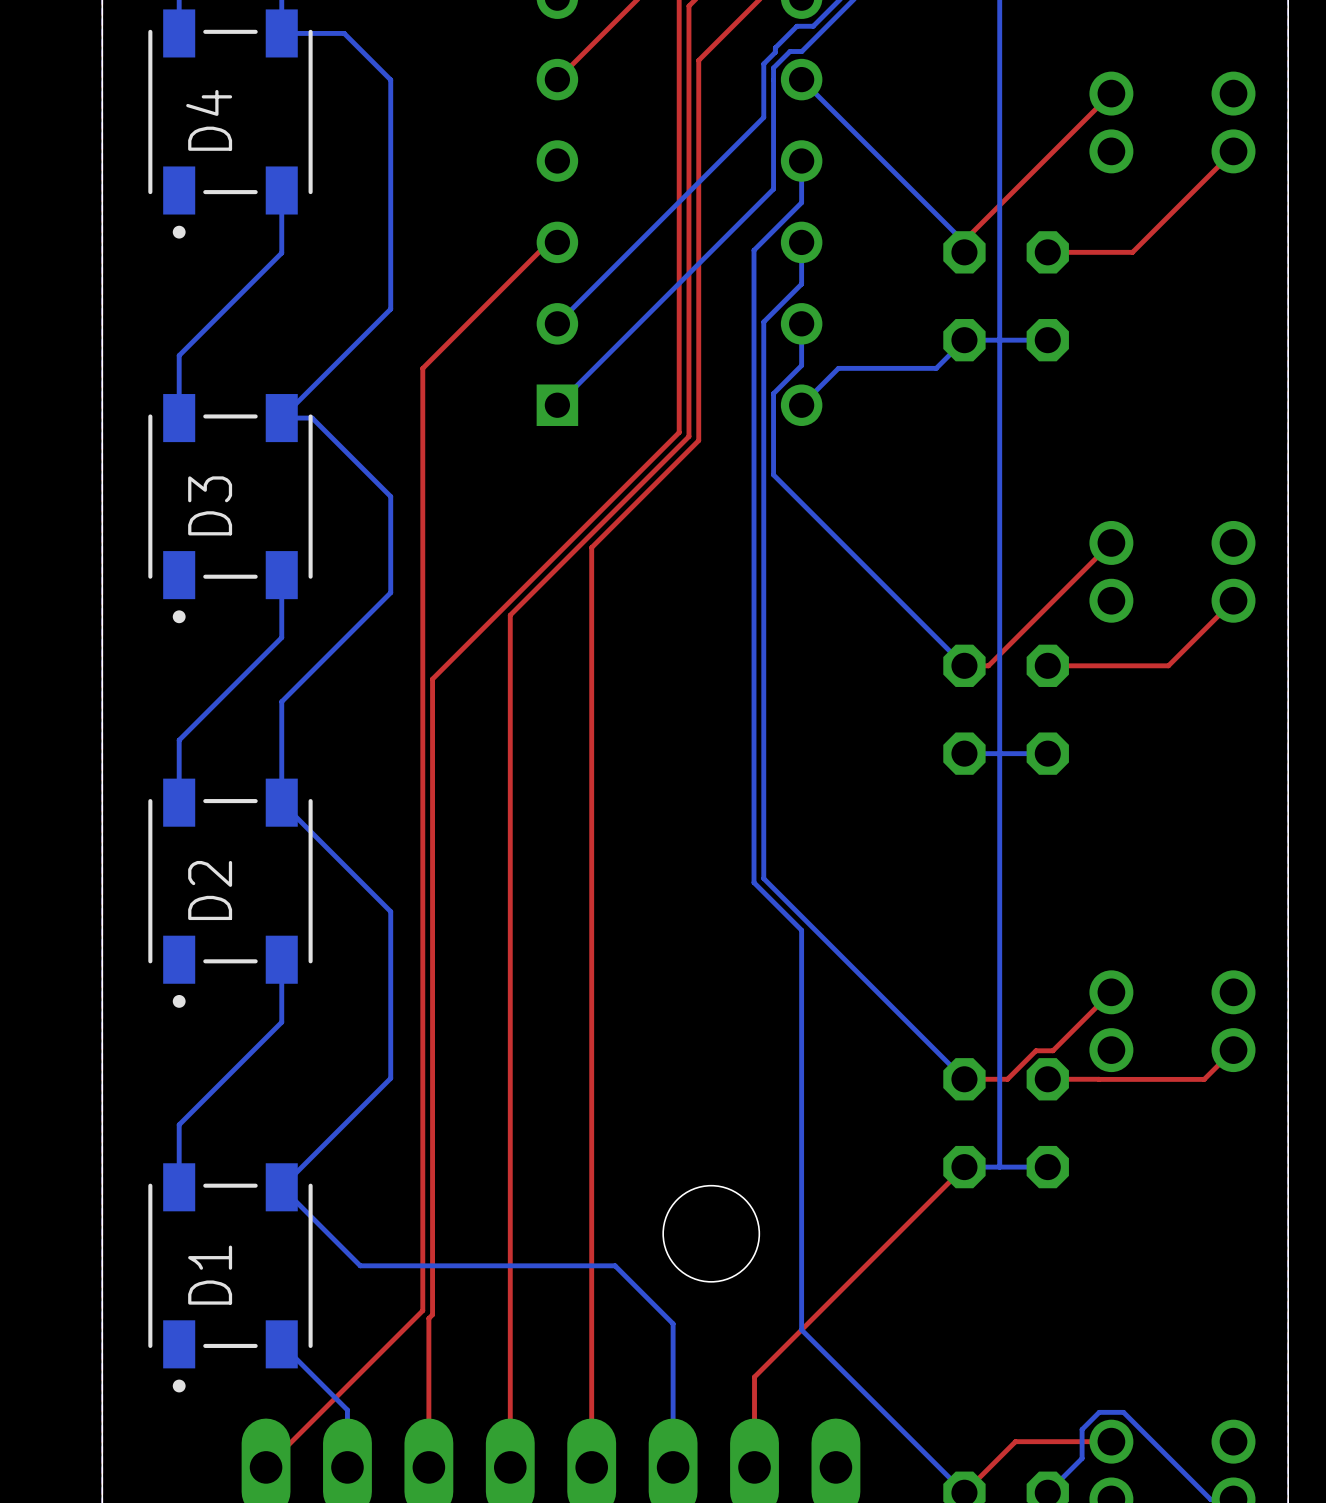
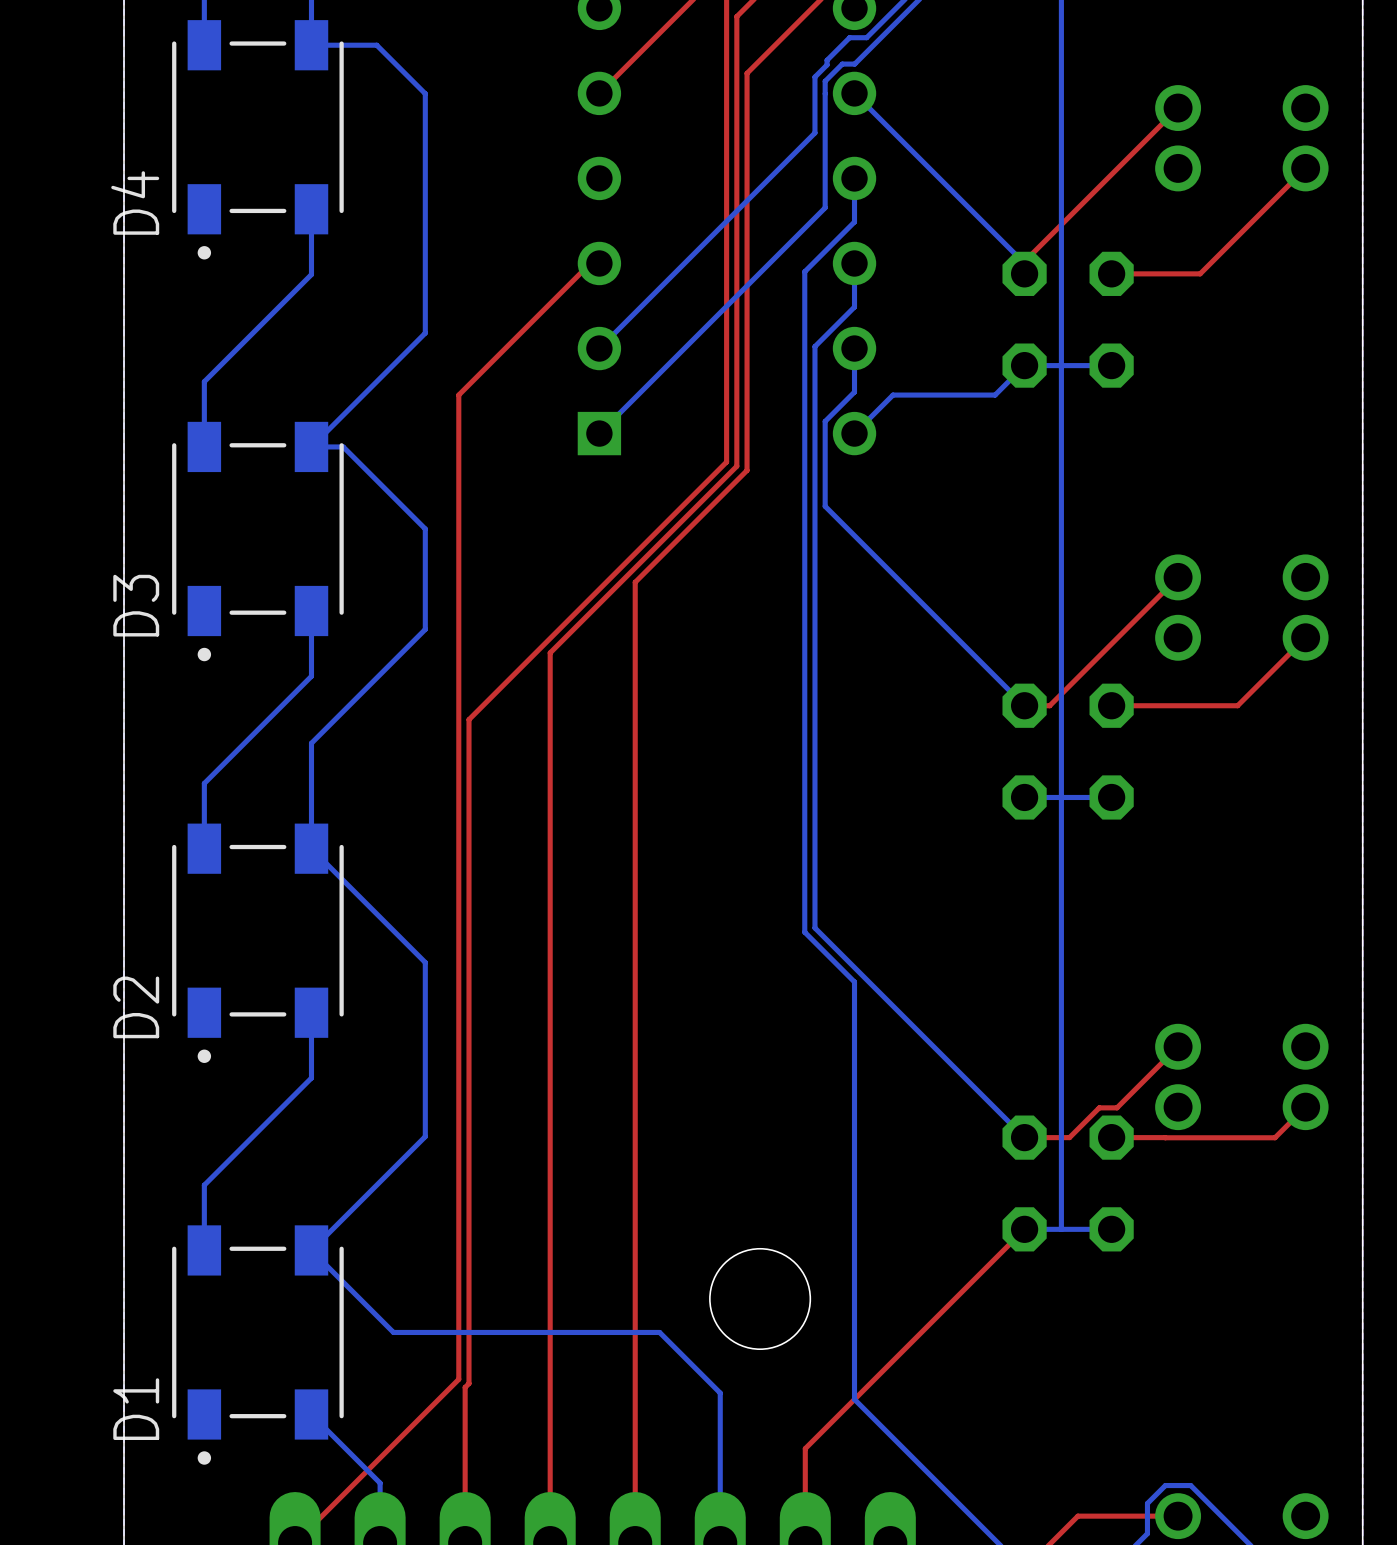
D4 name position: D4 (209, 120) -> D4 (135, 202)
D3 name position: D3 (210, 505) -> D3 (136, 605)
D2 name position: D2 (210, 890) -> D2 (136, 1007)
D1 name position: D1 (210, 1275) -> D1 (136, 1409)

